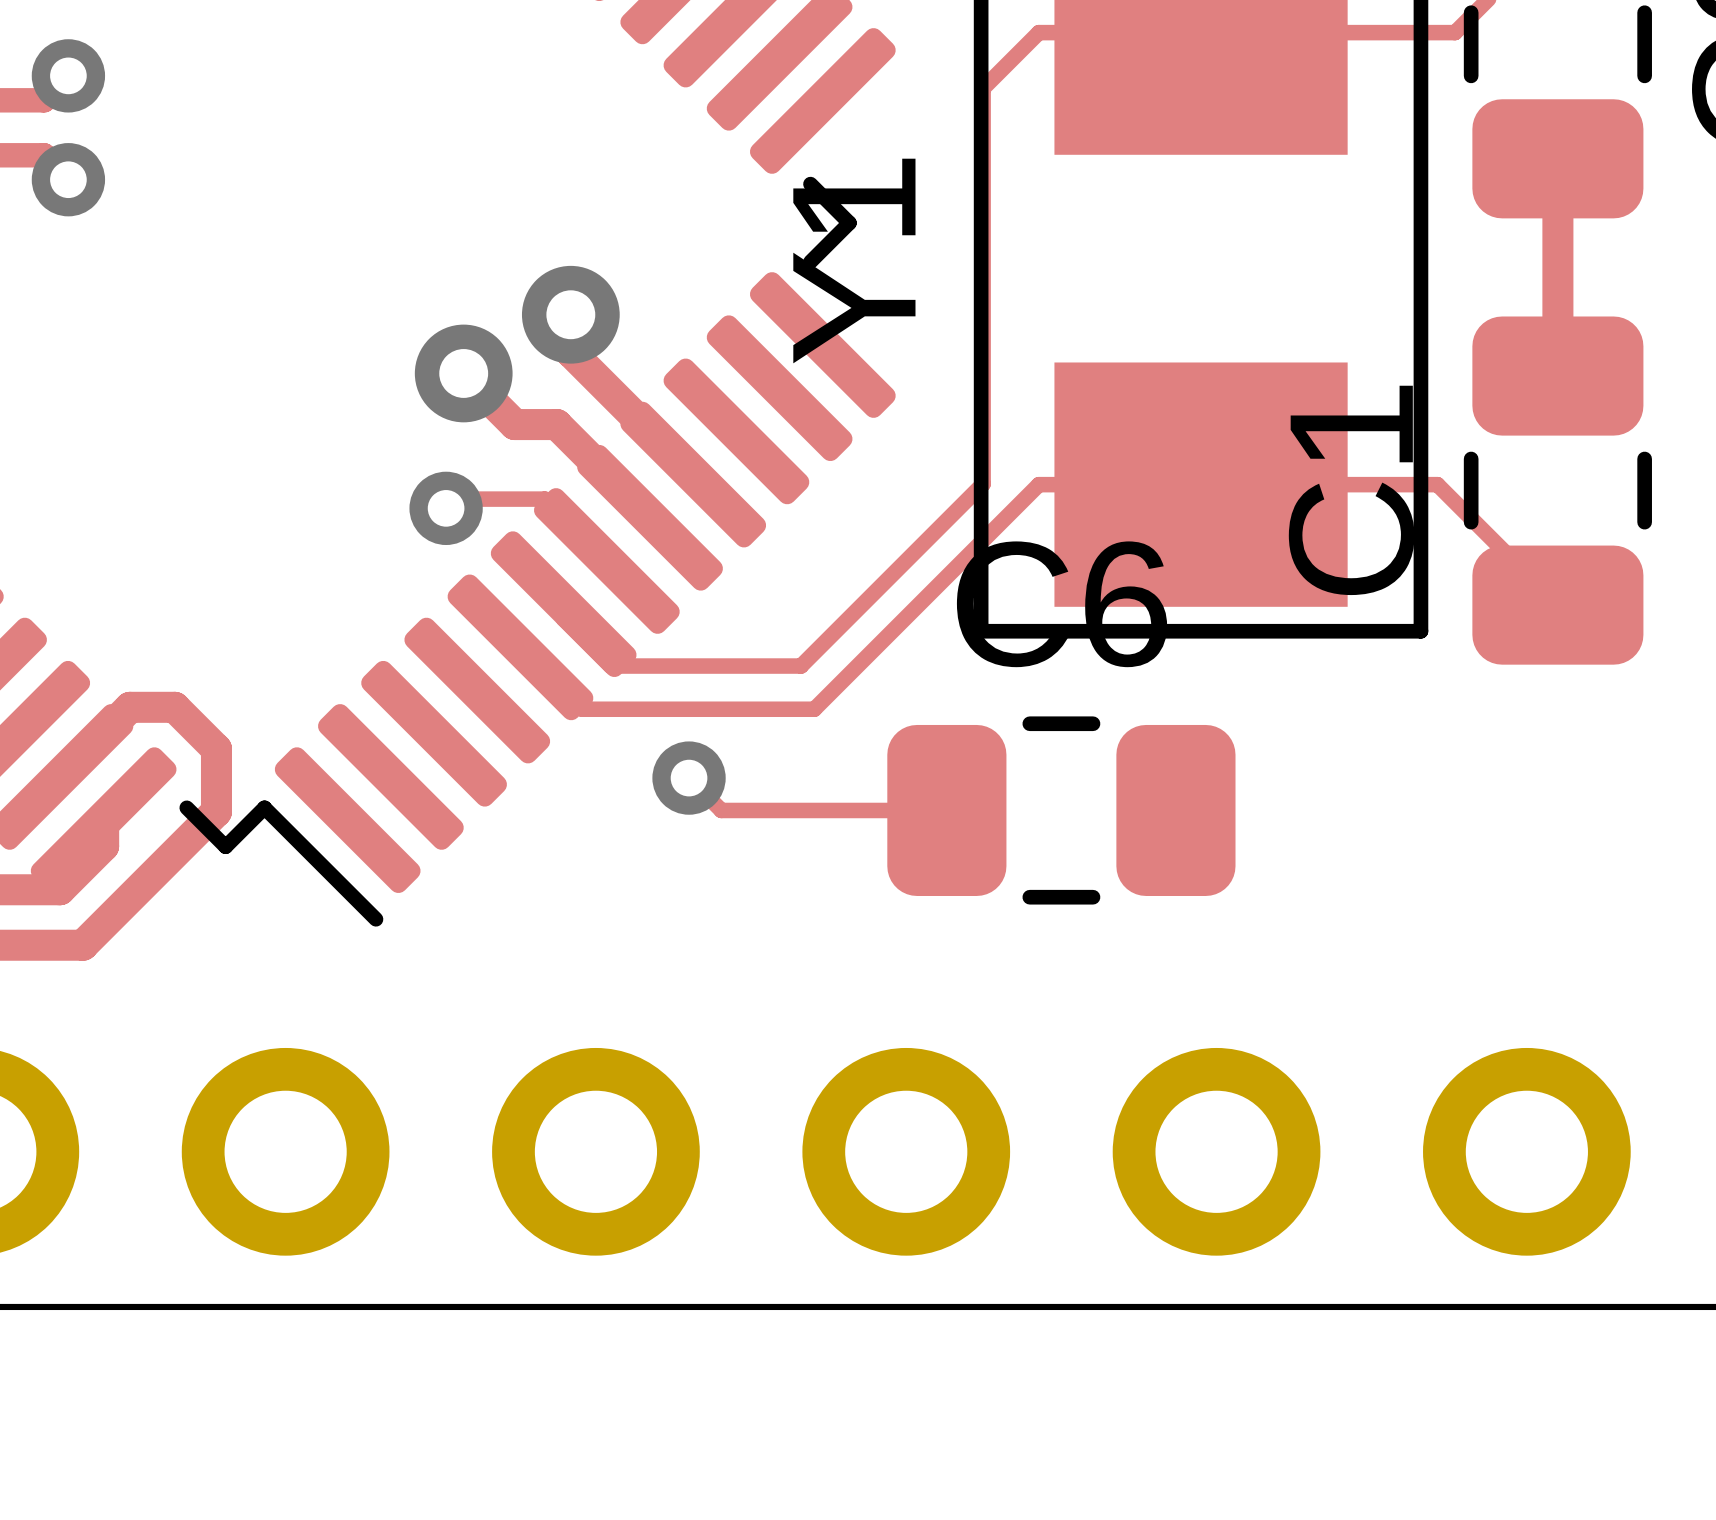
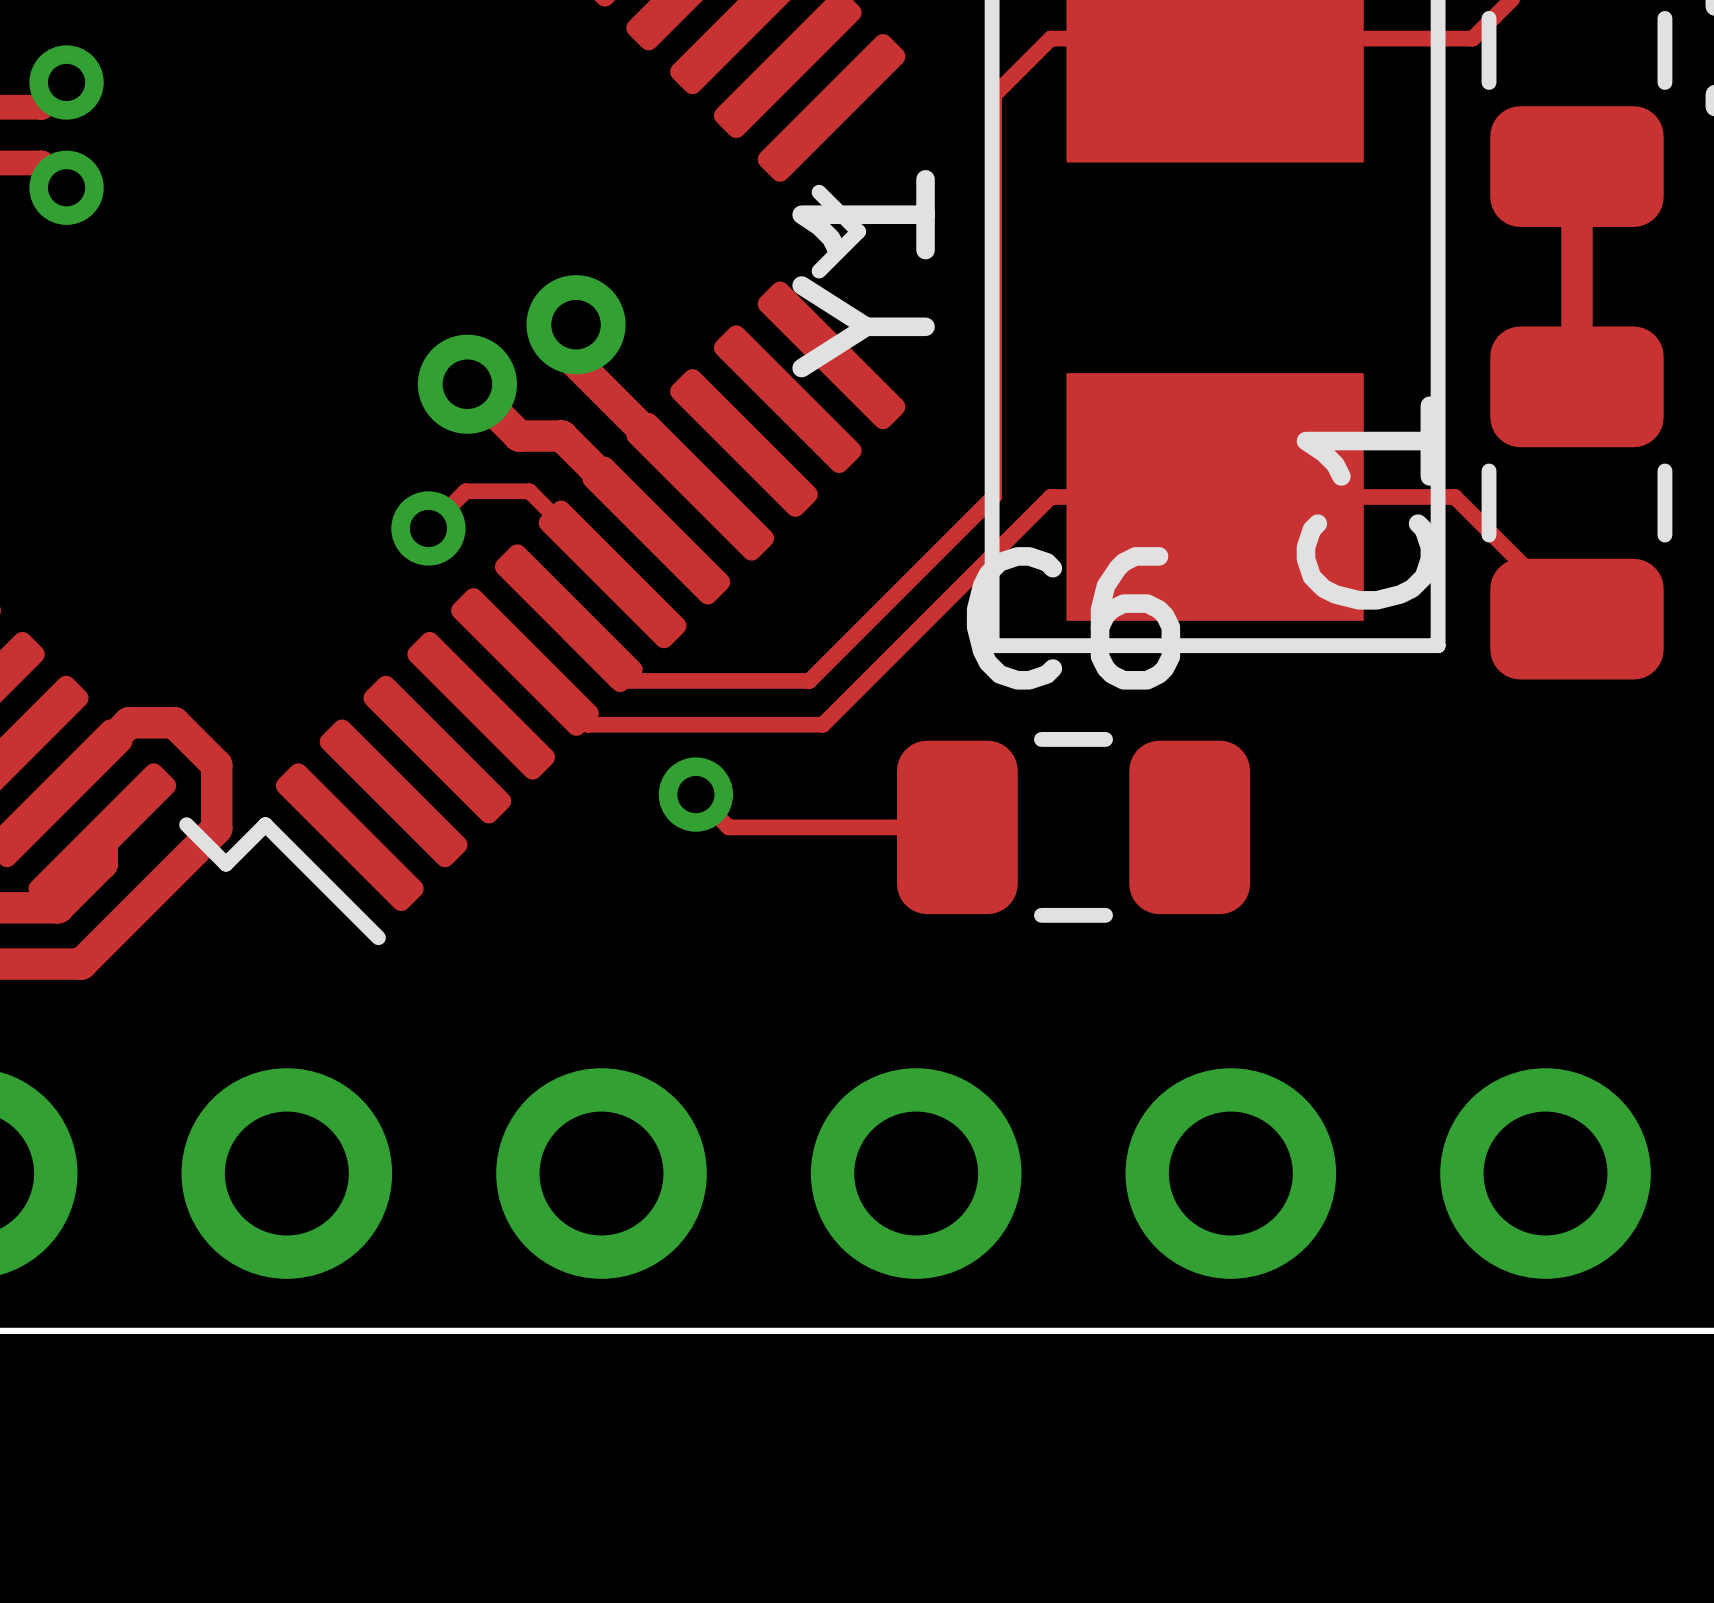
track: (544, 499) (455, 499) (446, 508) -> (549, 511) (529, 491) (465, 491) (428, 528)
via position: (446, 508) -> (428, 528)

